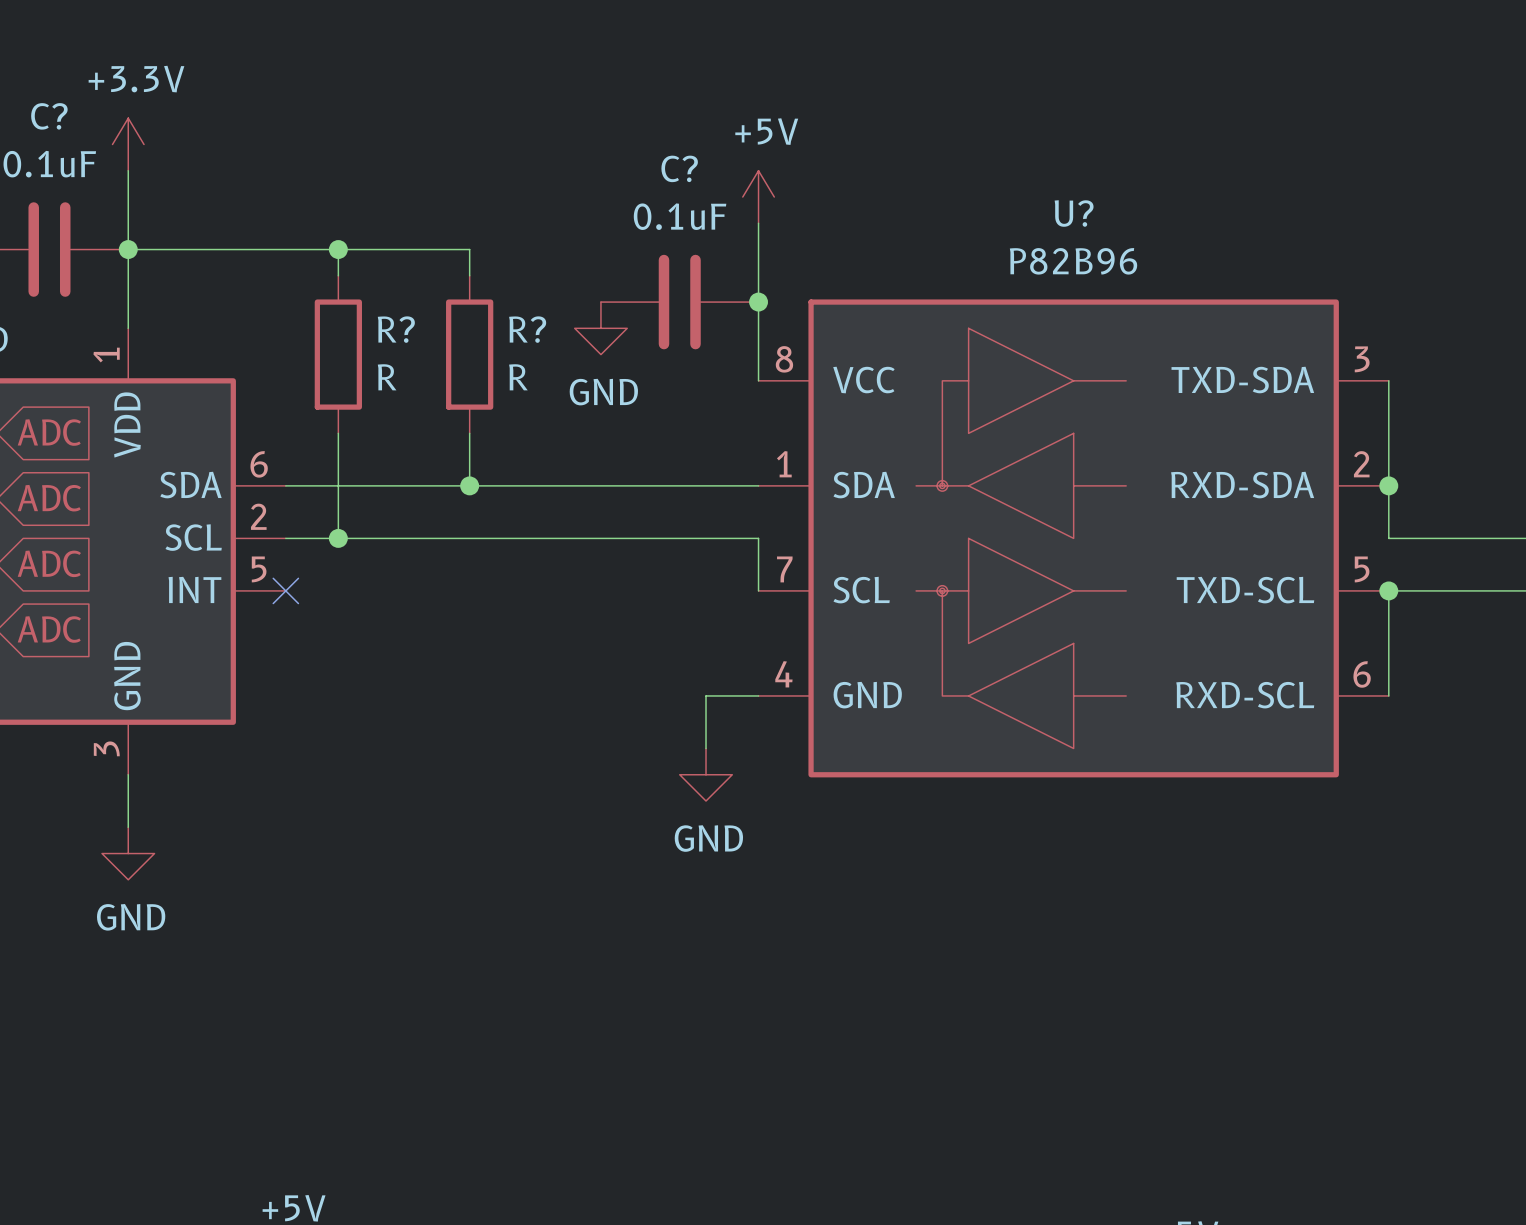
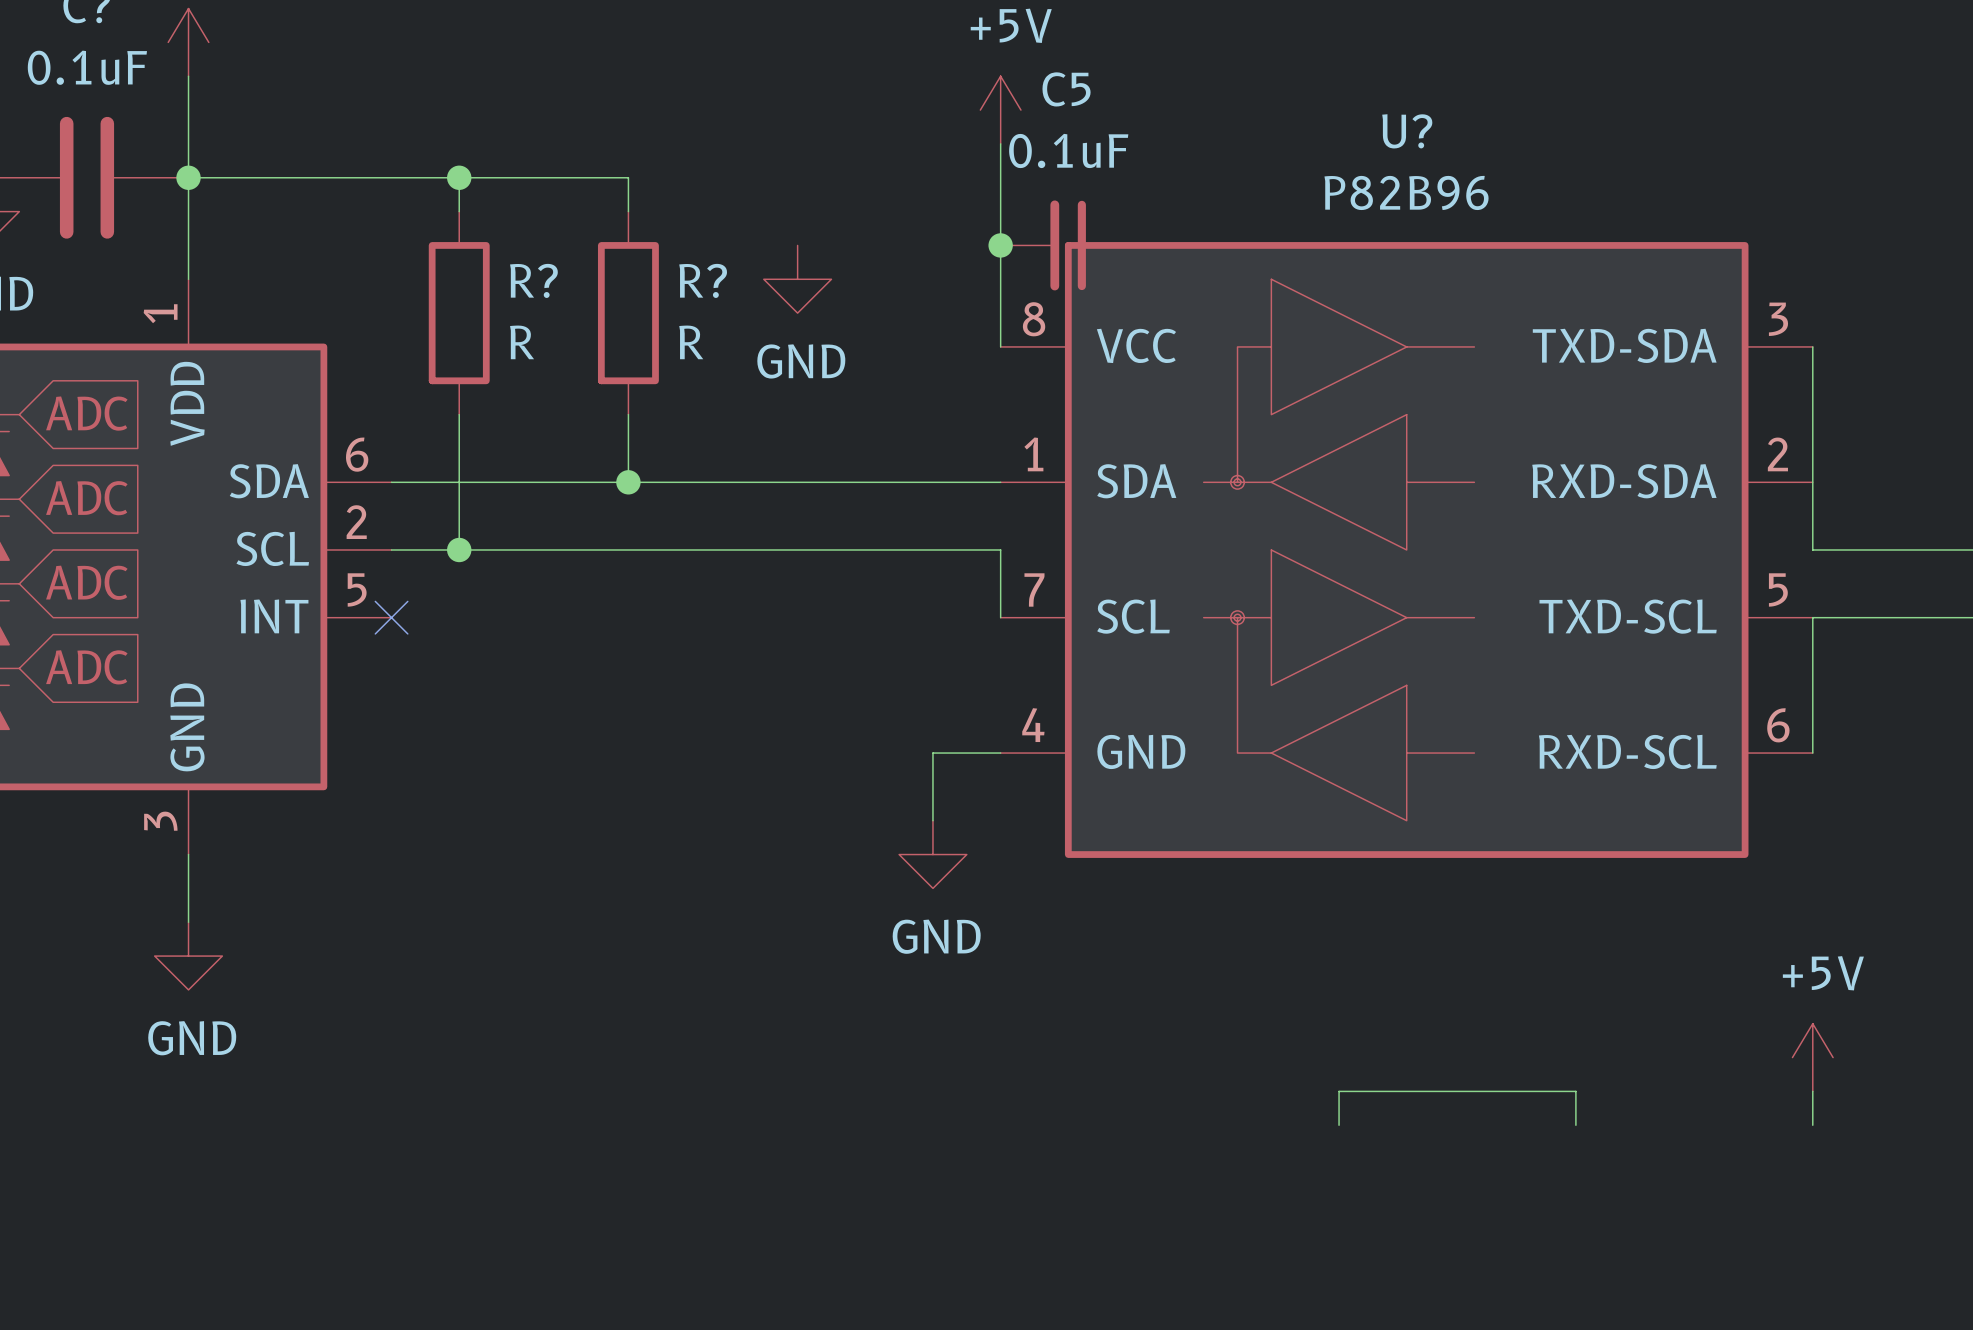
C?: 0.1uF (679, 302) -> none
C5: none -> 0.1uF (1068, 245)
junction: (1388, 485) -> none
junction: (1388, 590) -> none
power symbol: none -> +5V (1812, 1057)
wire: none -> (1812, 1091) (1812, 1125)
wire: none -> (1339, 1125) (1339, 1091) (1575, 1091) (1575, 1125)

